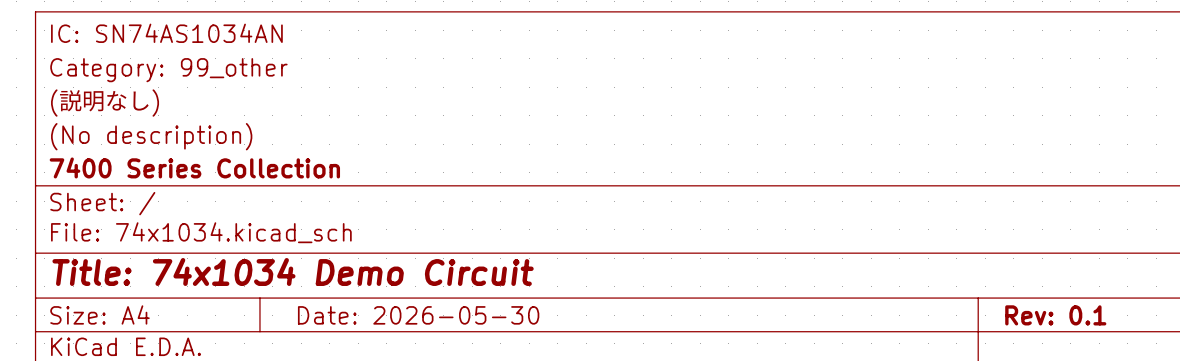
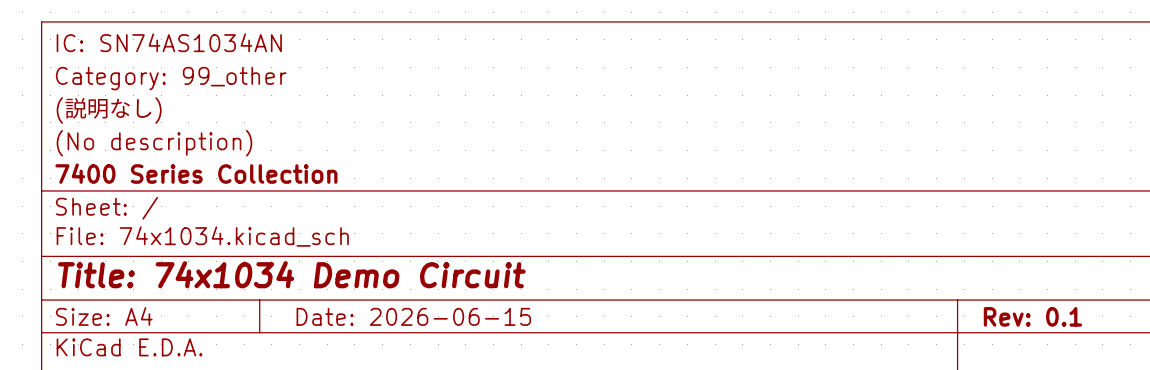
title block: Date: 2026-05-30 (418, 315) -> Date: 2026-06-15 (413, 316)

